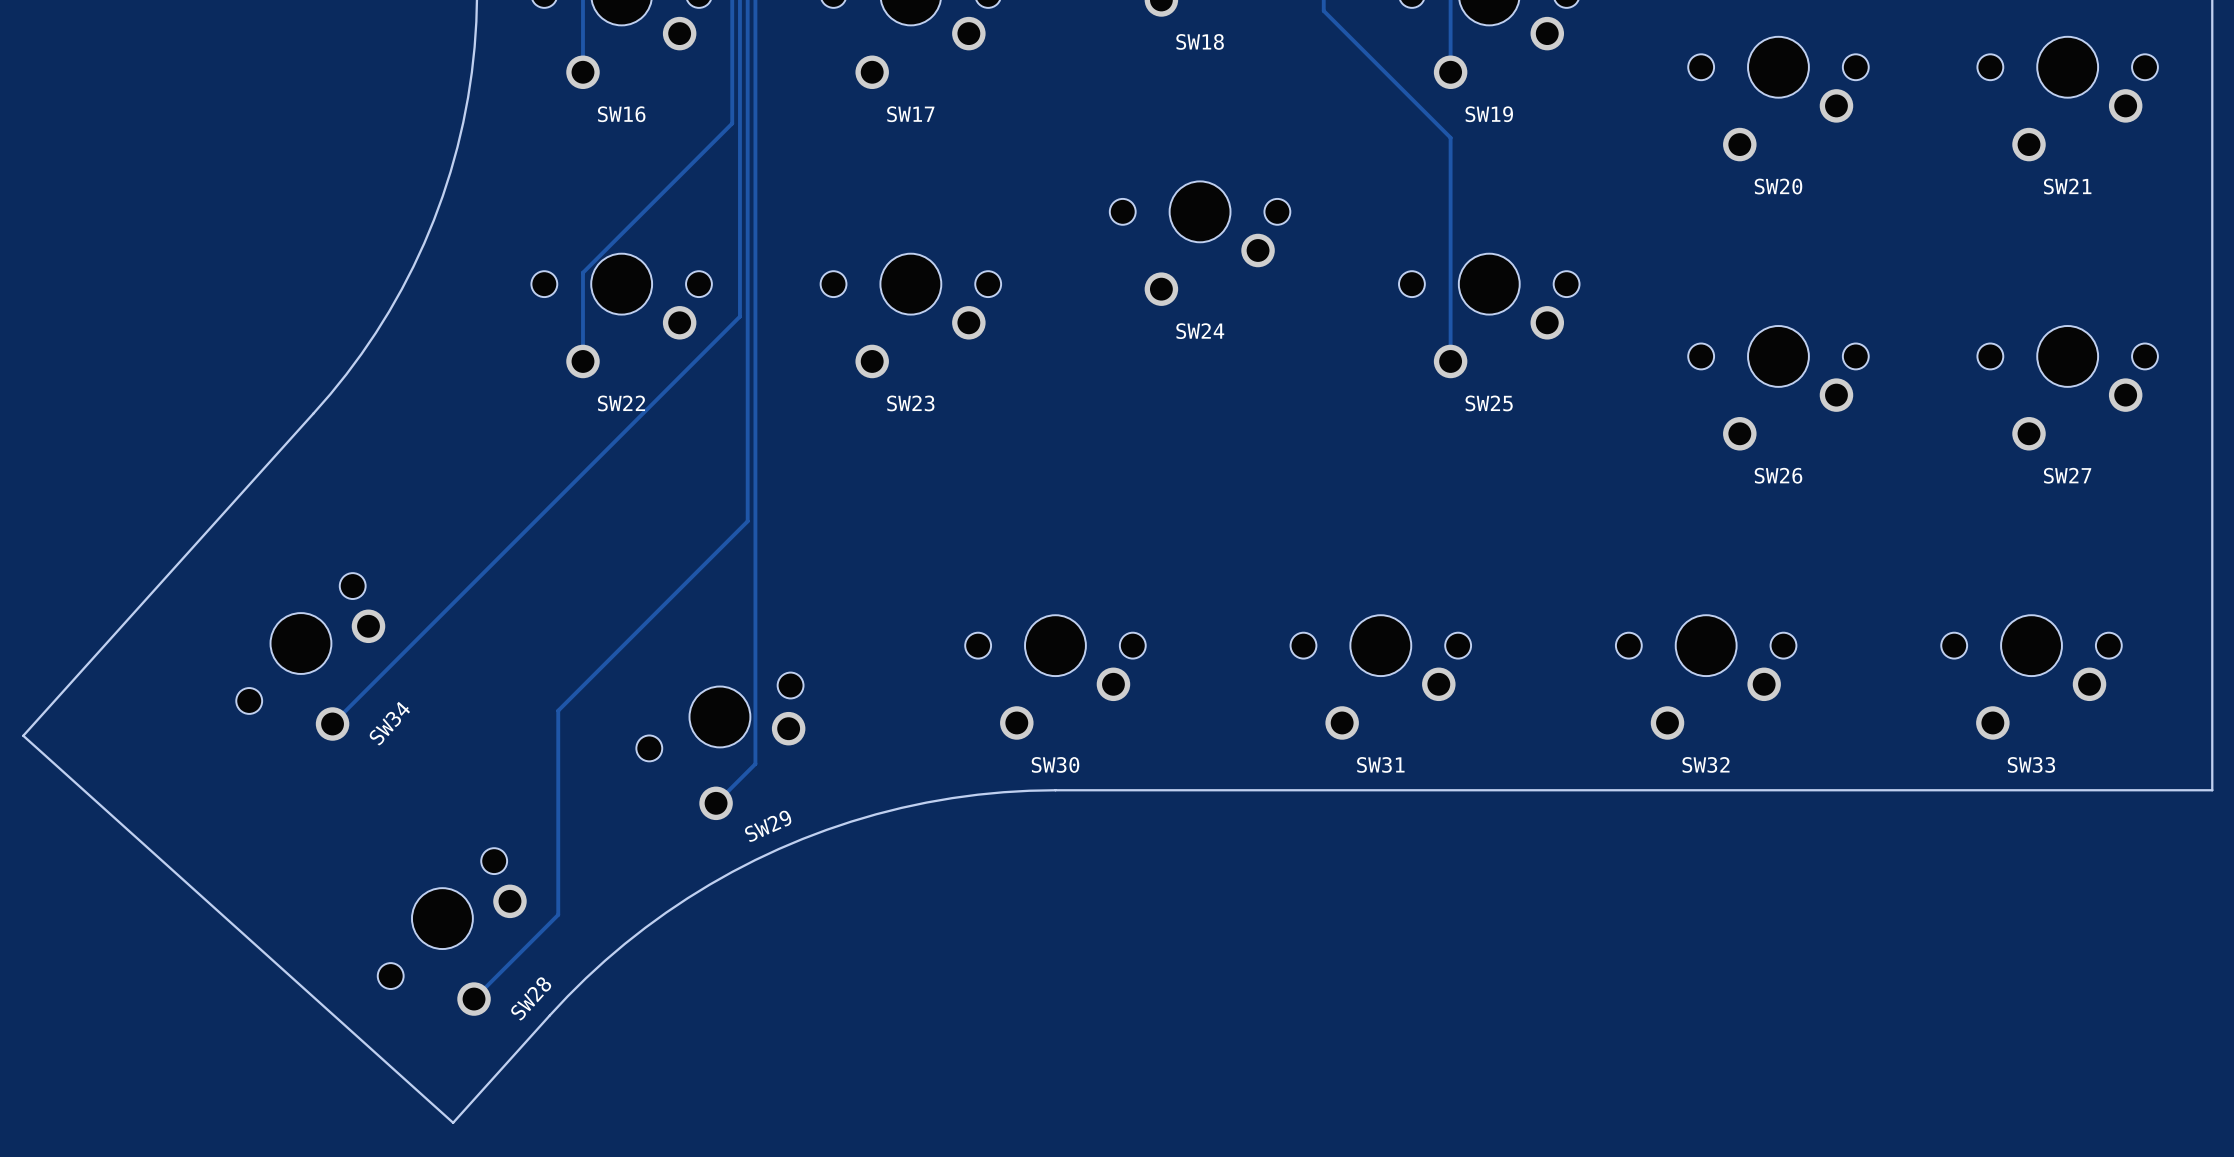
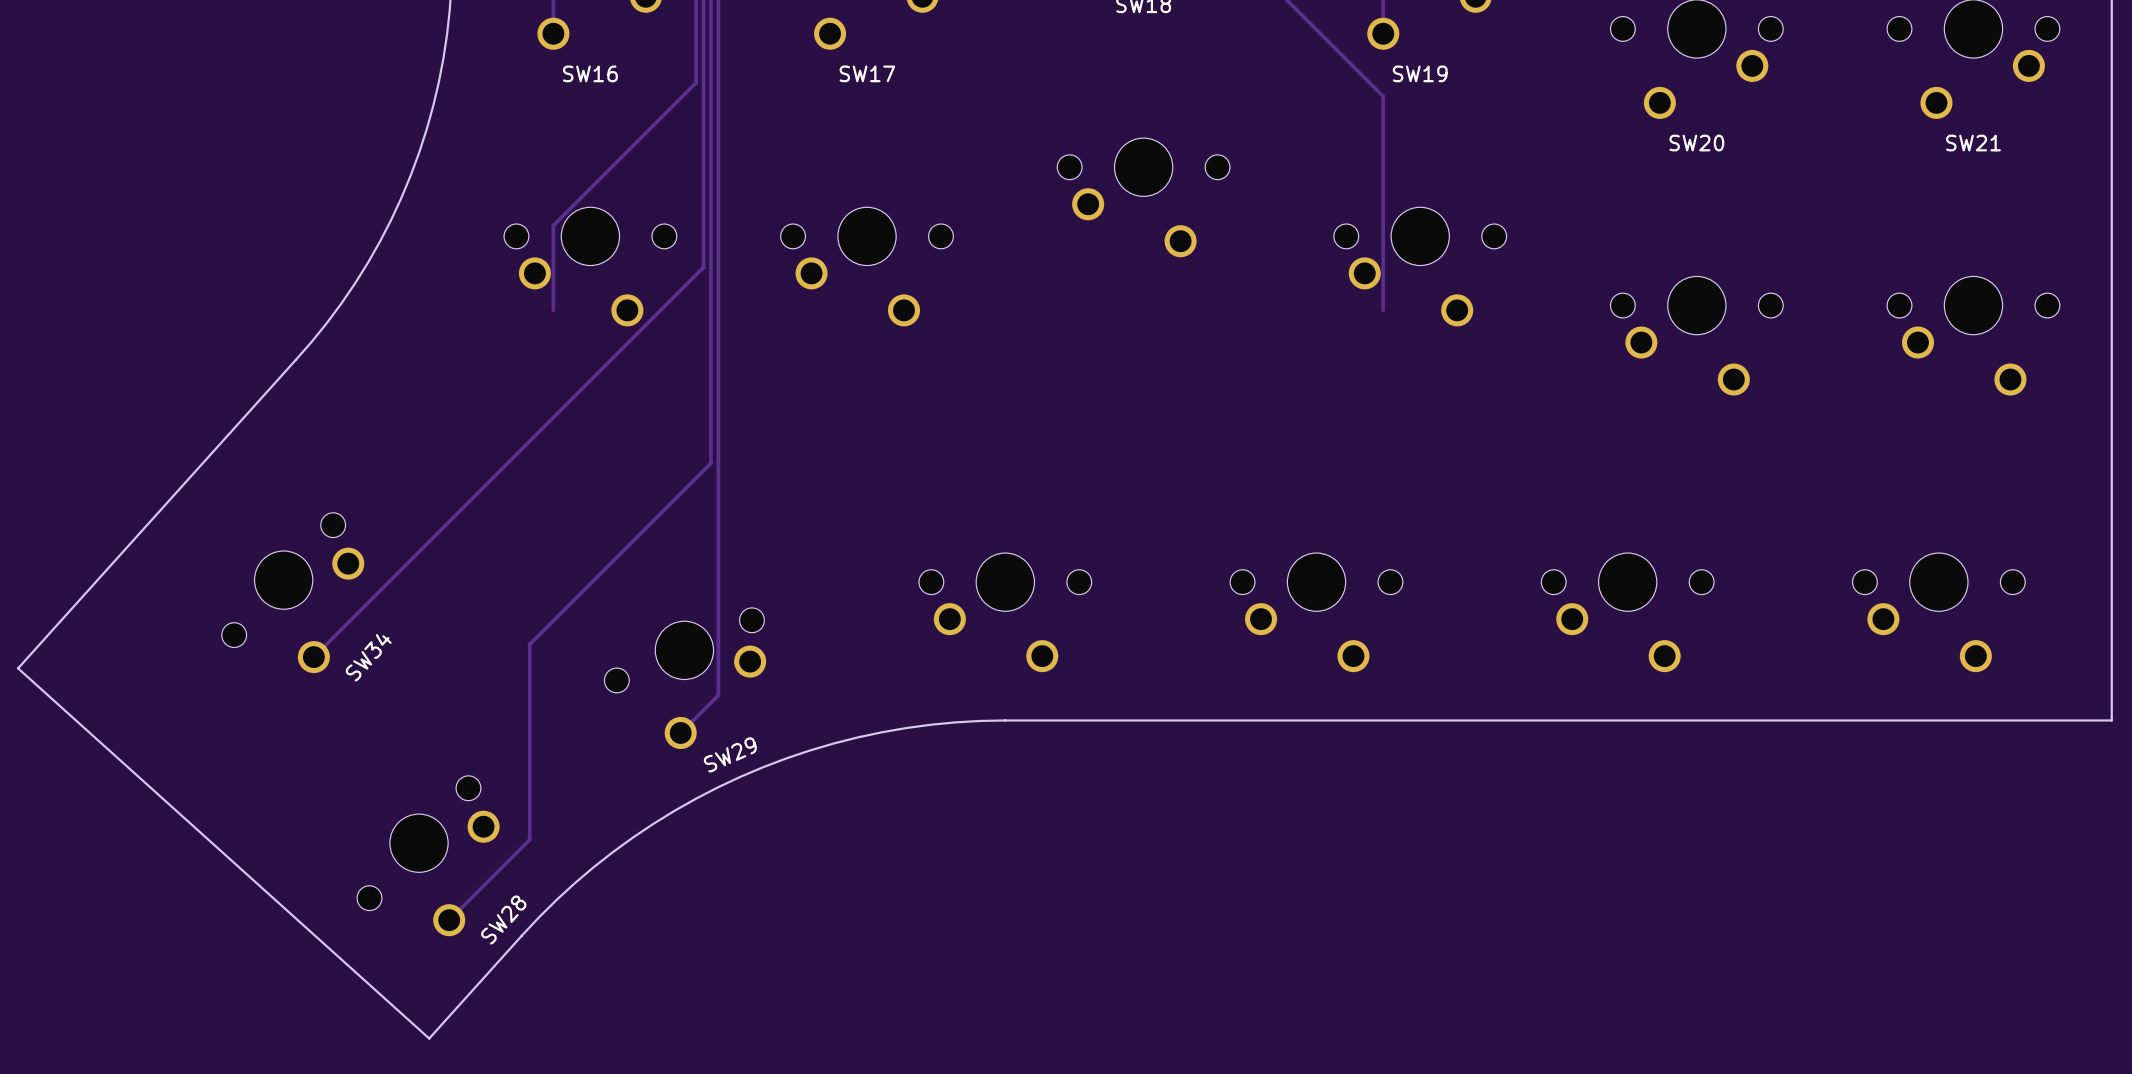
SW24 side: top (1200, 243) -> bottom (1143, 197)
SW22 side: top (621, 315) -> bottom (590, 266)
SW23 side: top (910, 315) -> bottom (867, 266)
SW25 side: top (1489, 315) -> bottom (1420, 266)
SW26 side: top (1778, 388) -> bottom (1696, 335)
SW27 side: top (2067, 388) -> bottom (1973, 335)
SW30 side: top (1055, 677) -> bottom (1005, 612)
SW31 side: top (1380, 677) -> bottom (1316, 612)
SW32 side: top (1706, 677) -> bottom (1627, 612)
SW33 side: top (2031, 677) -> bottom (1938, 612)

